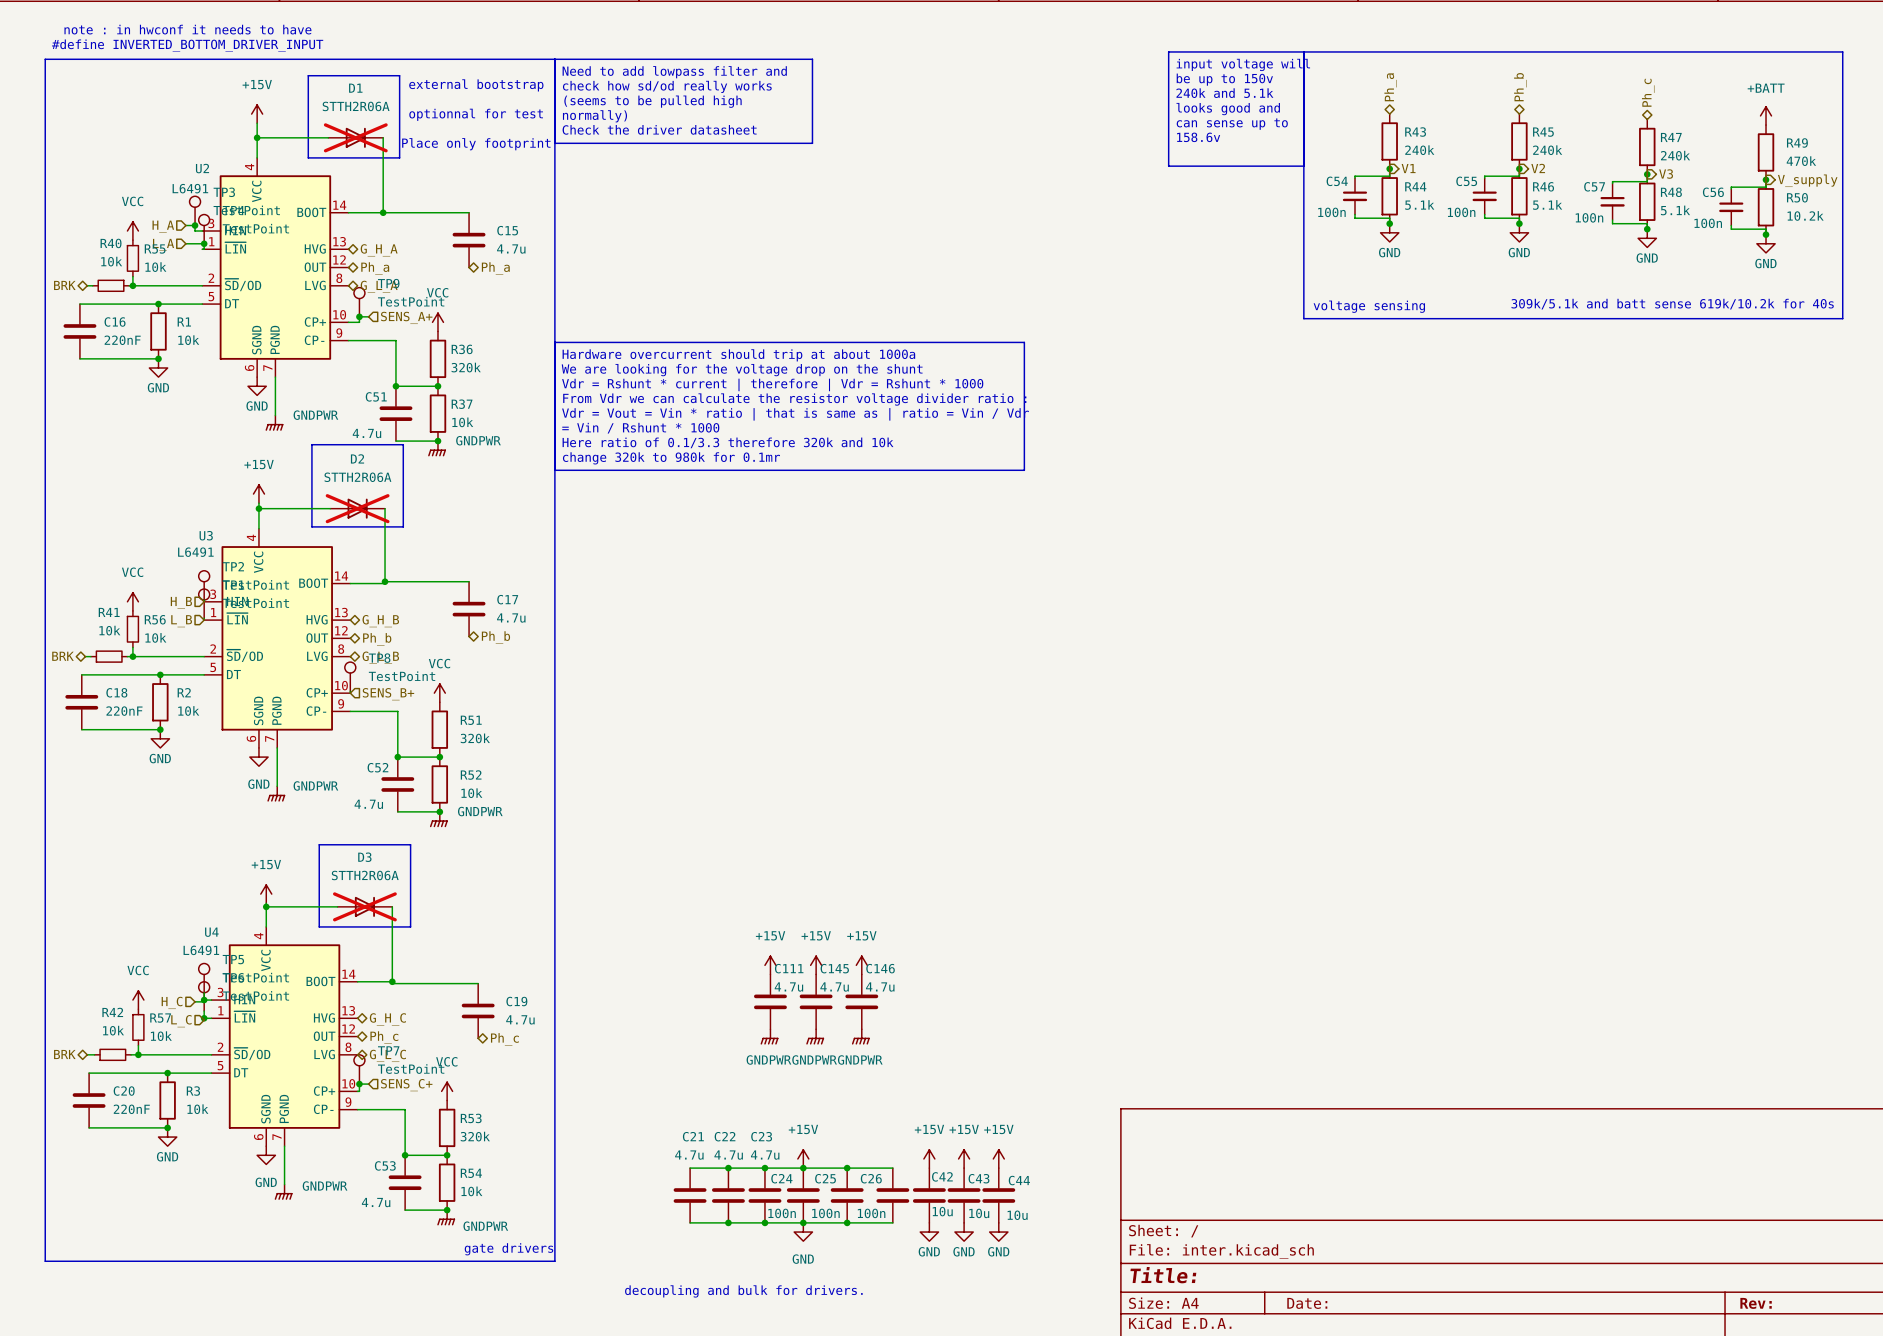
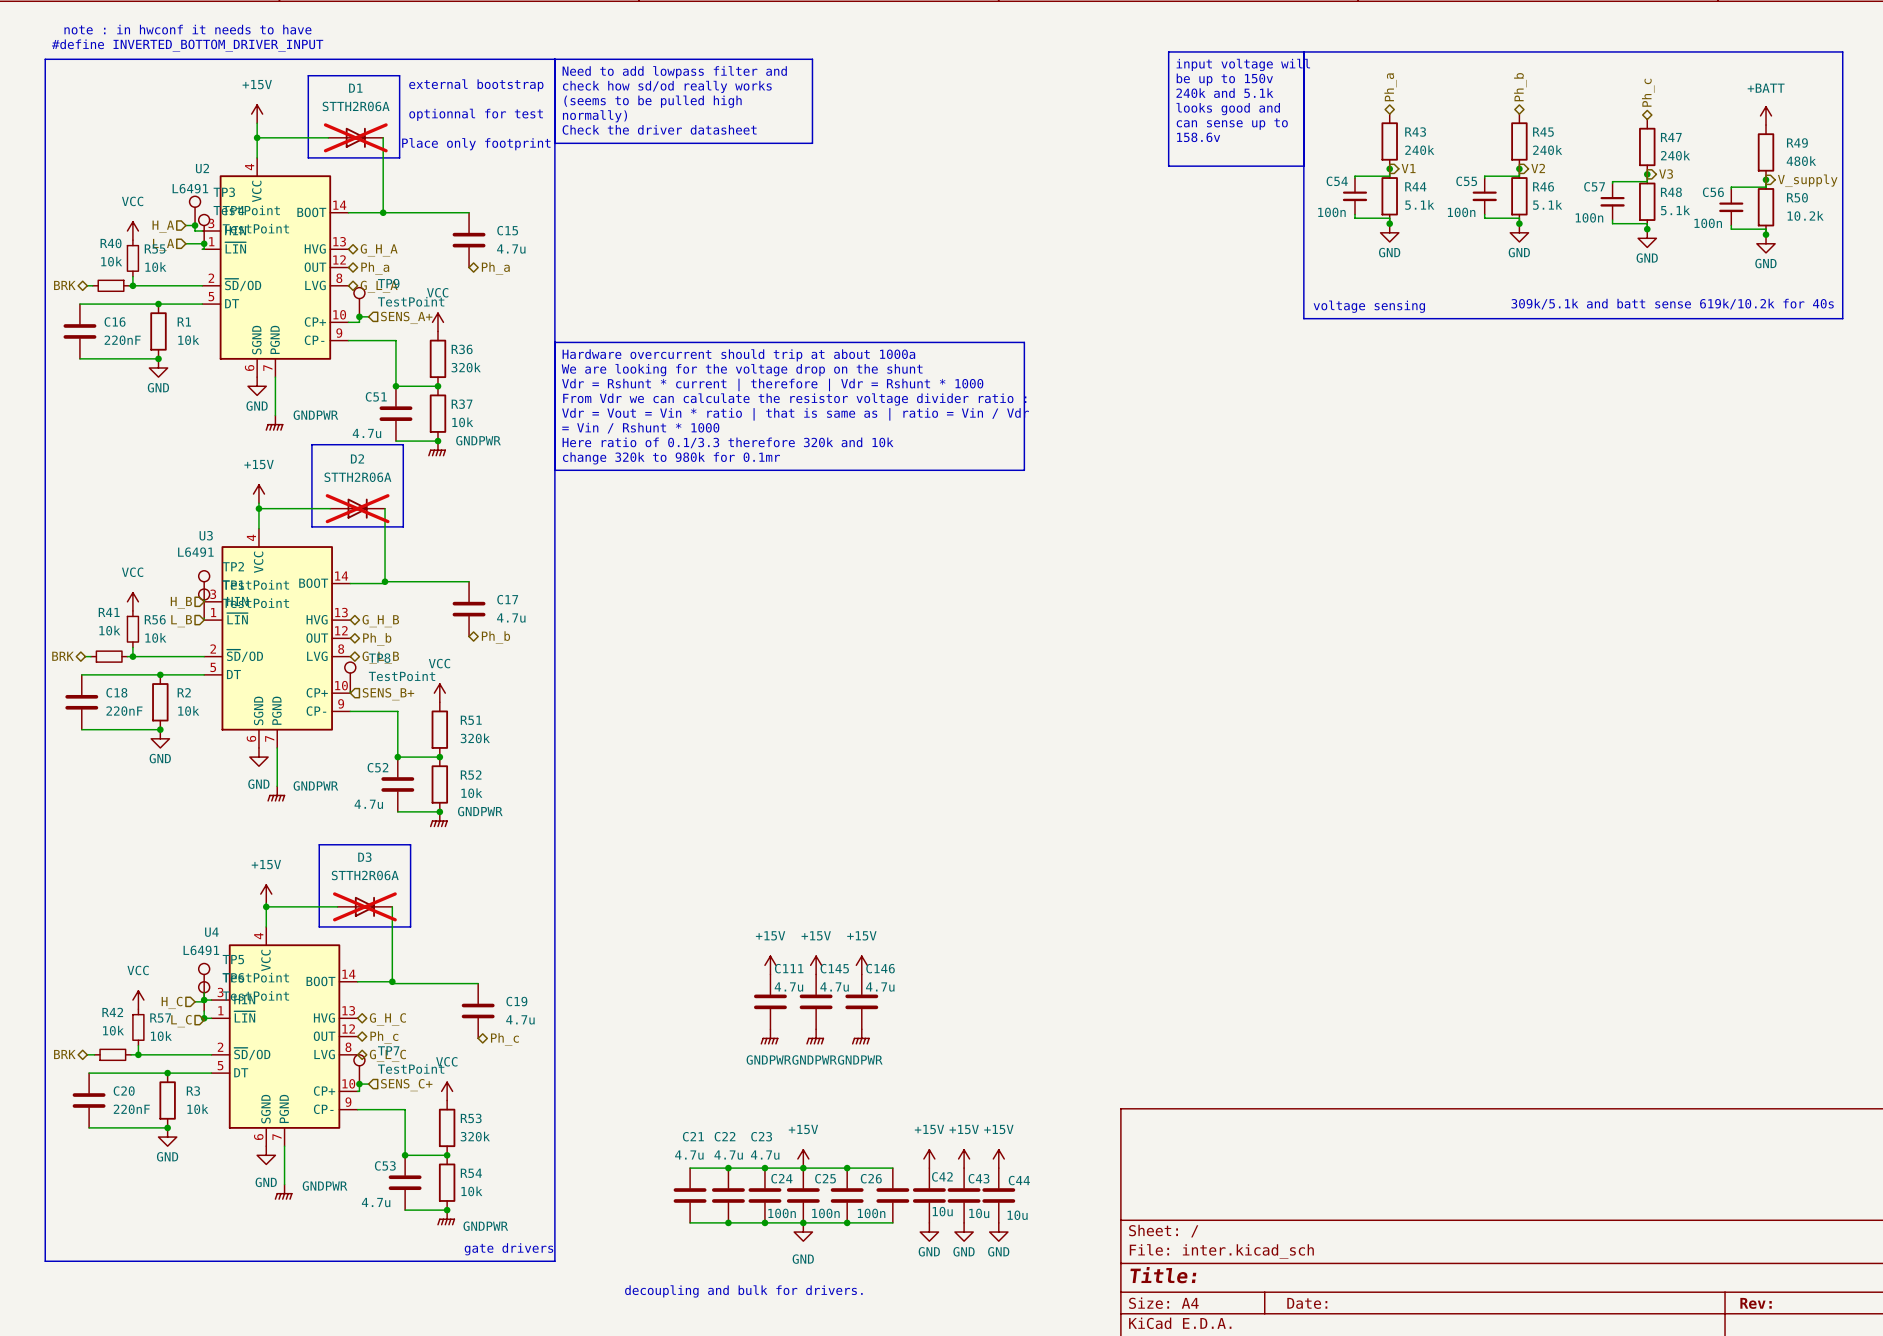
R49 value: 470k (1801, 161) -> 480k (1801, 161)

